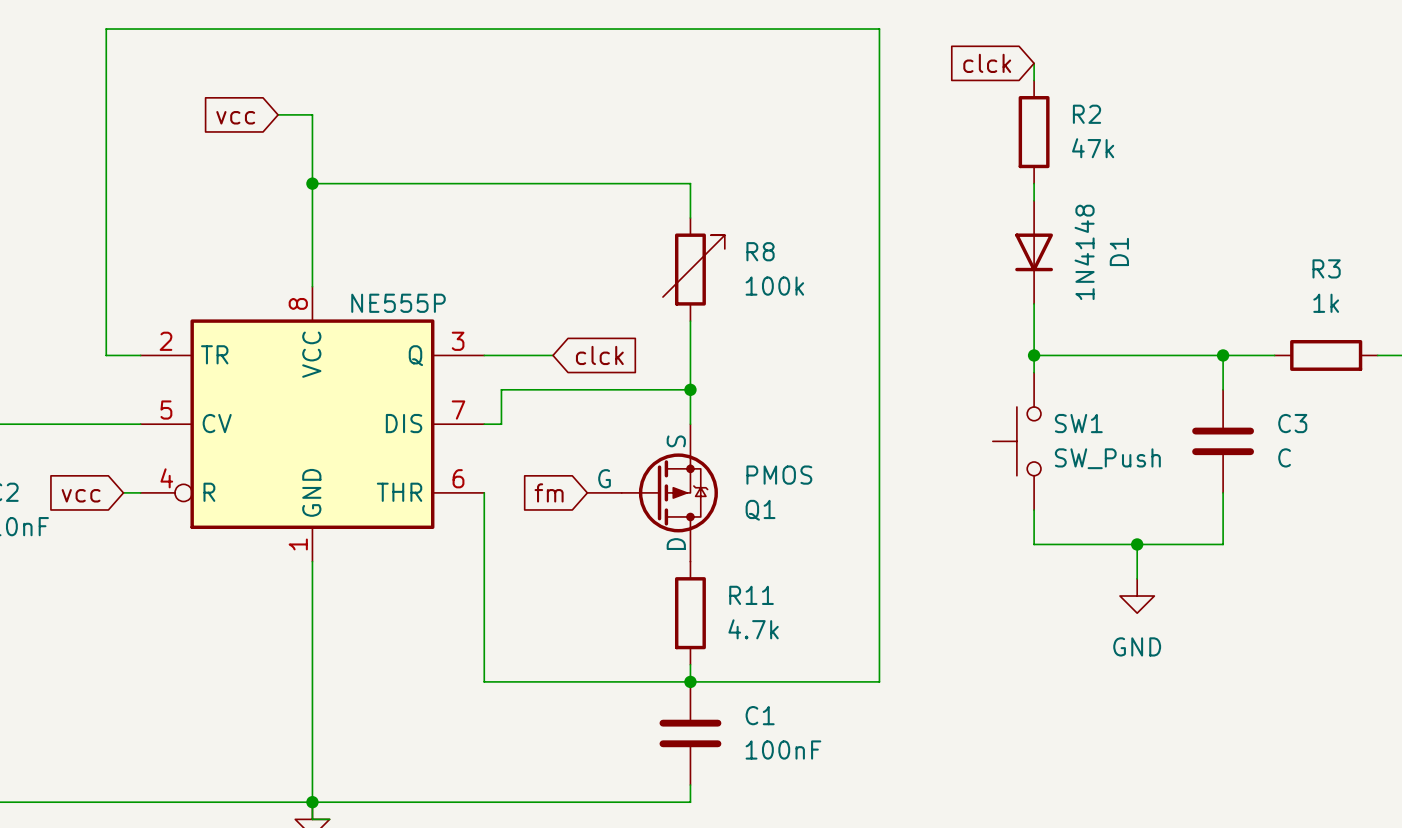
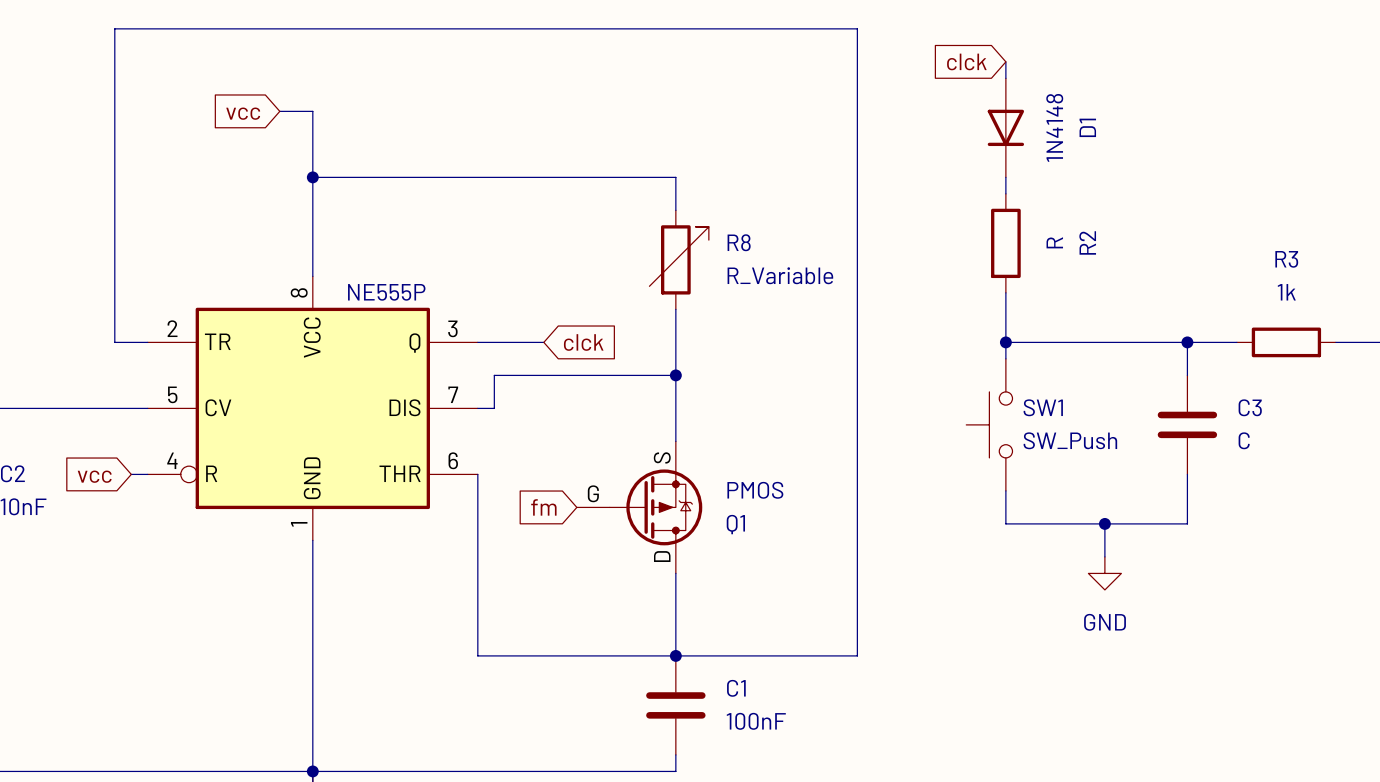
R2 name rotation: 0° (1086, 114) -> 90° counterclockwise (1087, 242)
R2 position: (1034, 132) -> (1005, 243)
R2 value: 47k (1093, 148) -> R (1054, 242)
D1 position: (1034, 252) -> (1005, 127)
R8 value: 100k (774, 286) -> R_Variable (780, 275)
global label position: fm (549, 492) -> fm (543, 507)
Q1 position: (652, 492) -> (639, 507)
wire: none -> (675, 573) (675, 639)
R11: 4.7k (690, 613) -> none

